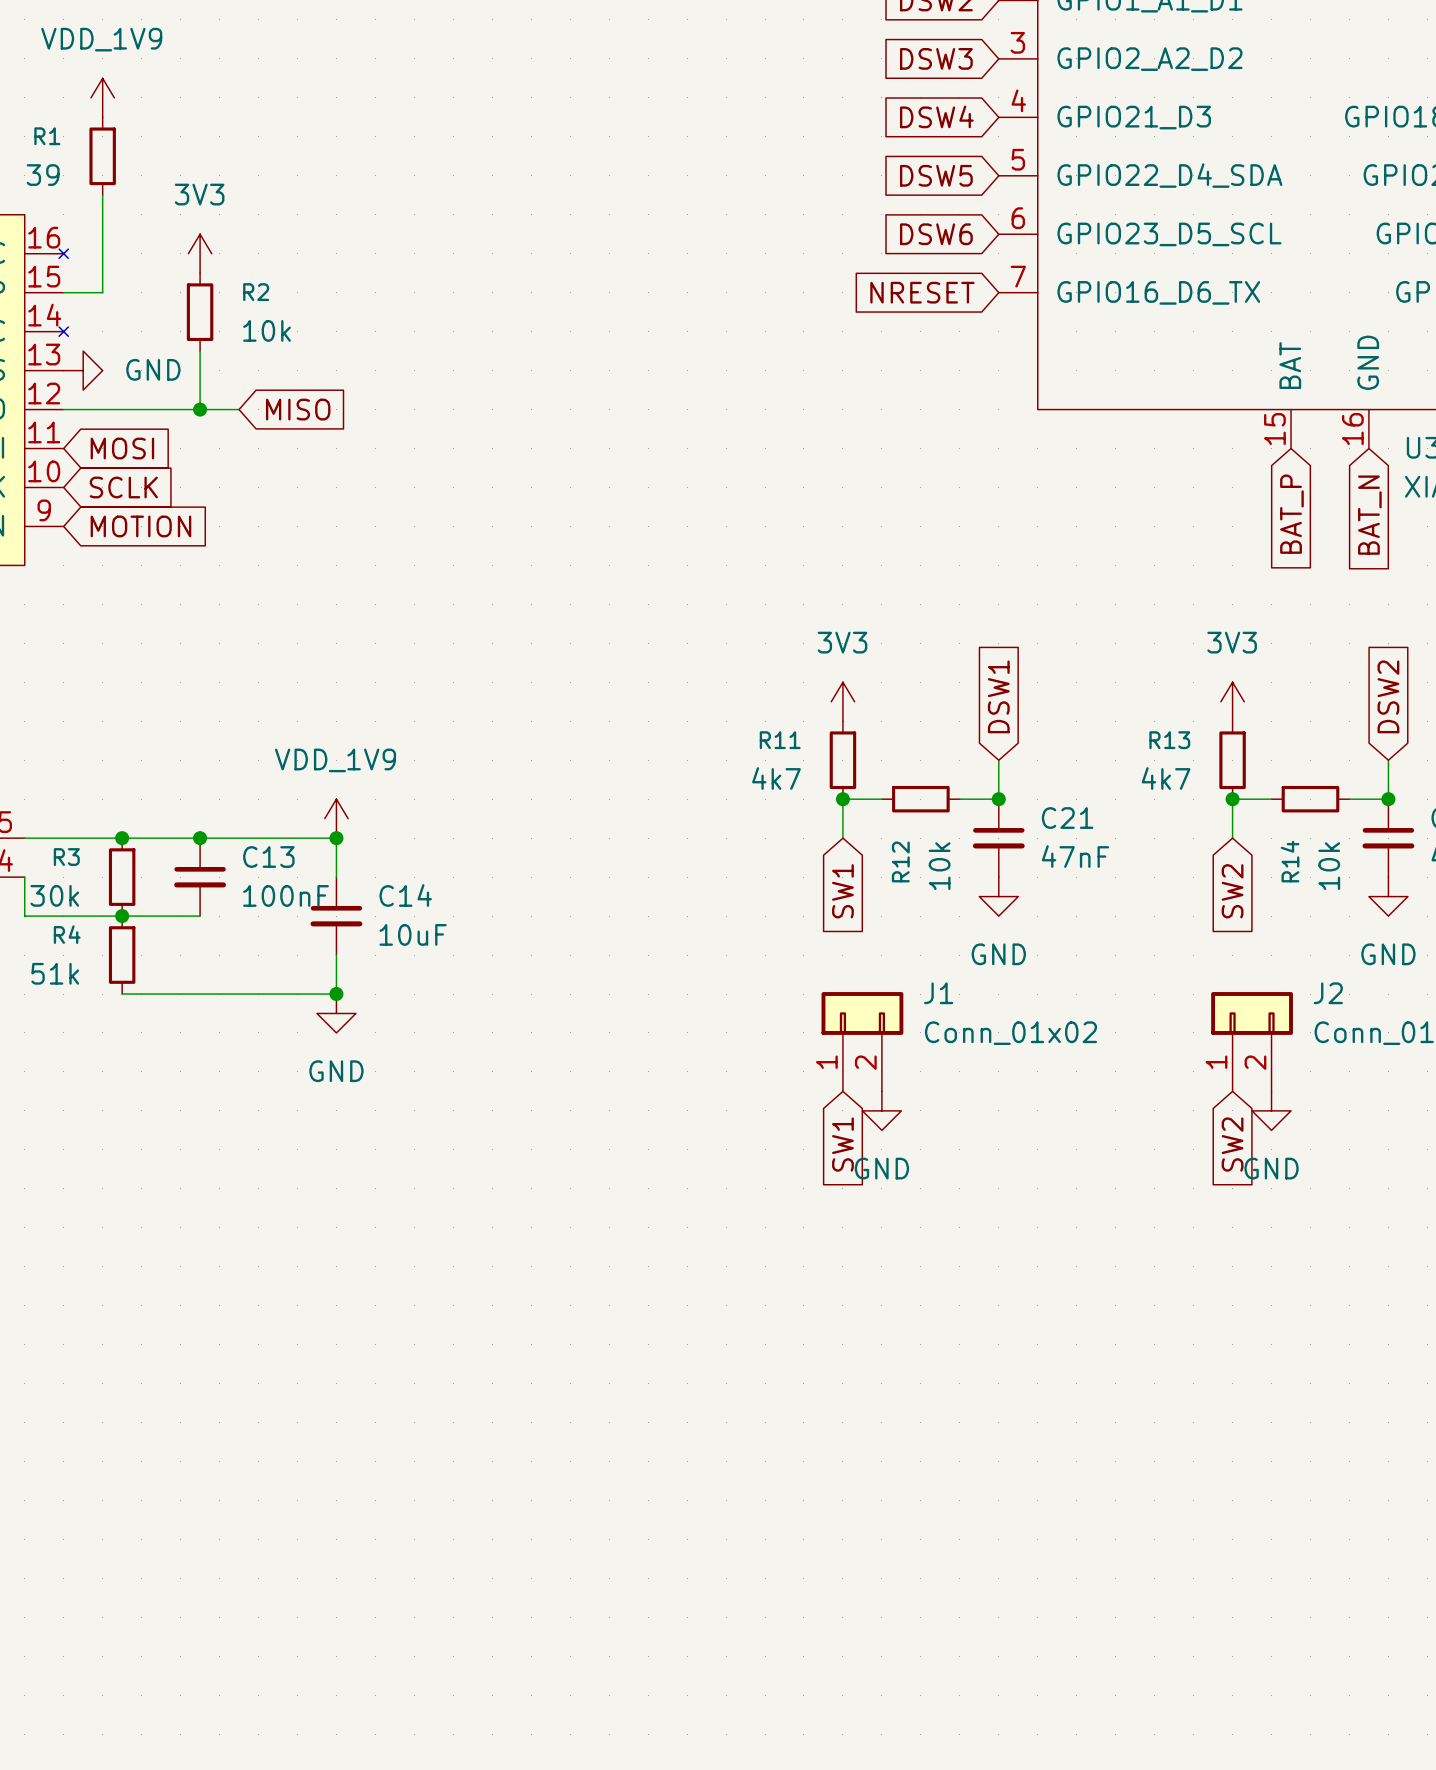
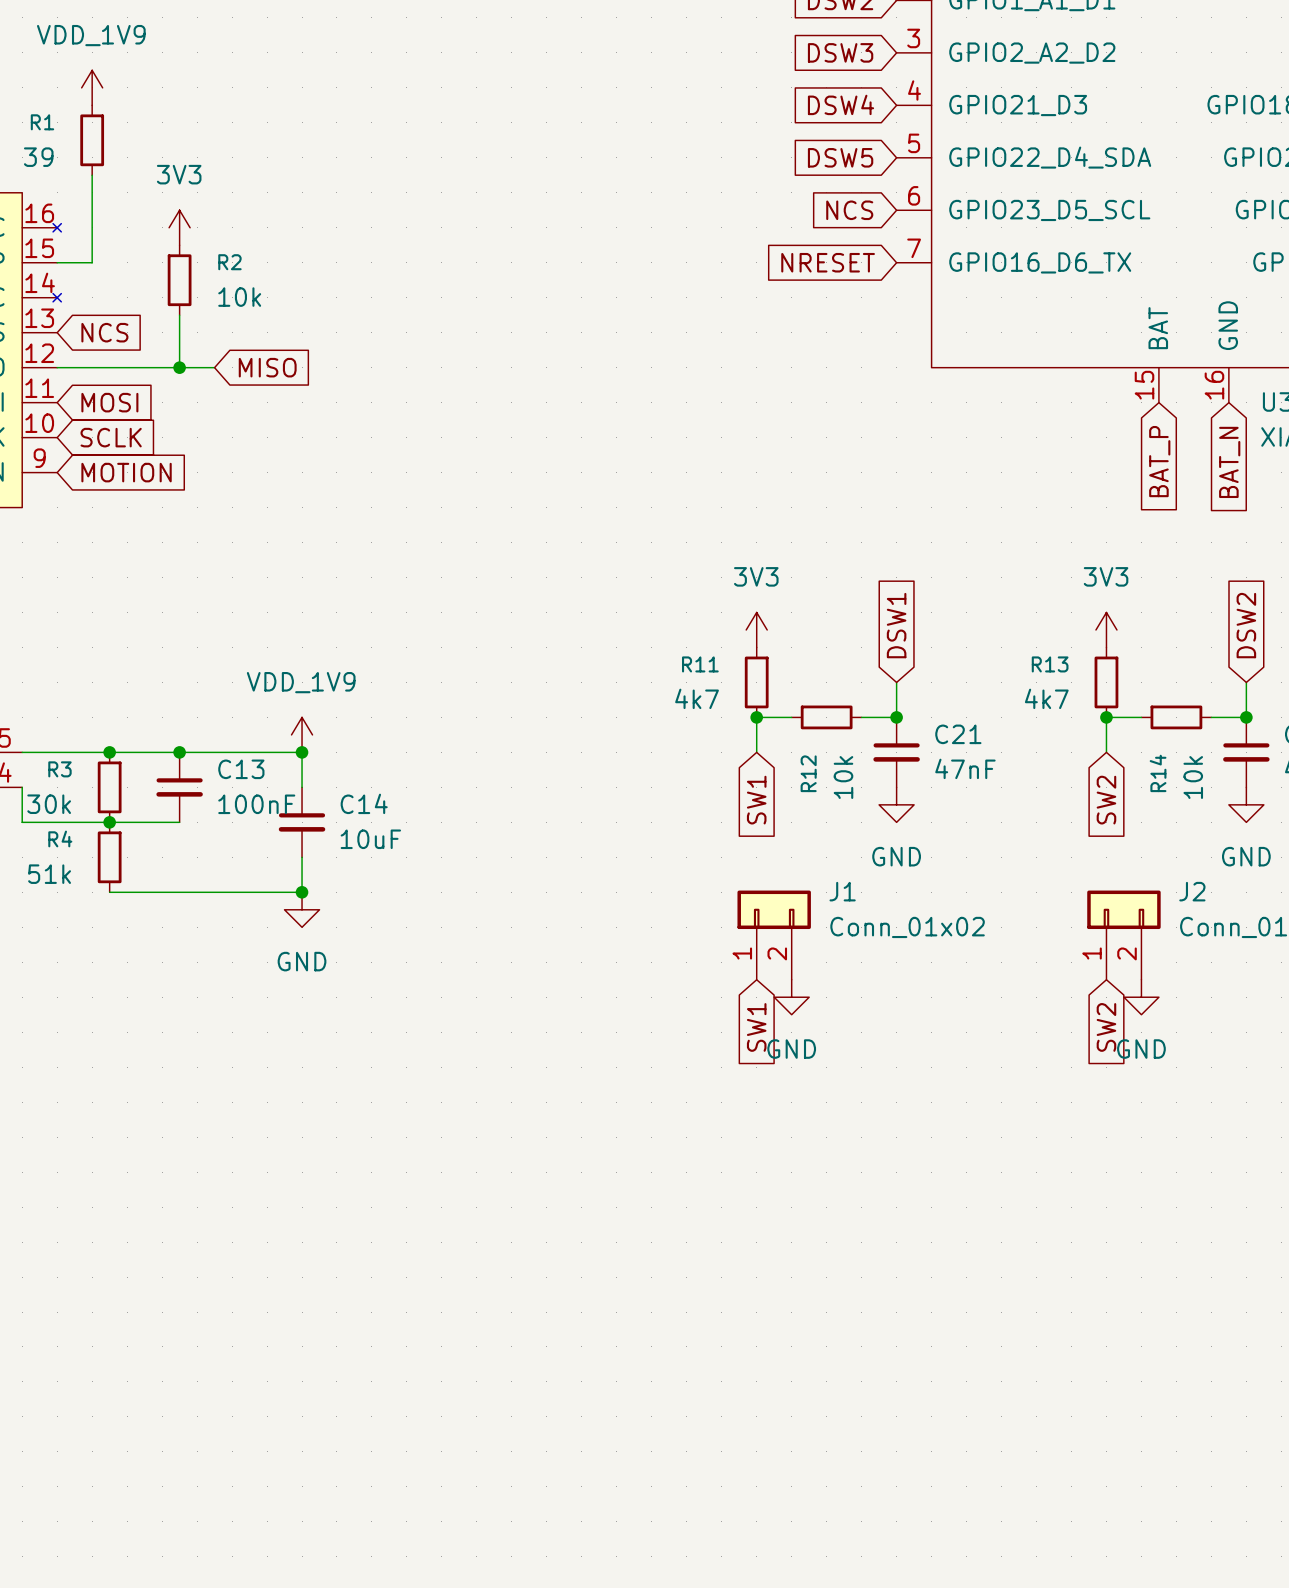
global label: DSW6 (936, 234) -> NCS (849, 210)
power symbol: GND (83, 370) -> none
global label: none -> NCS (104, 332)

